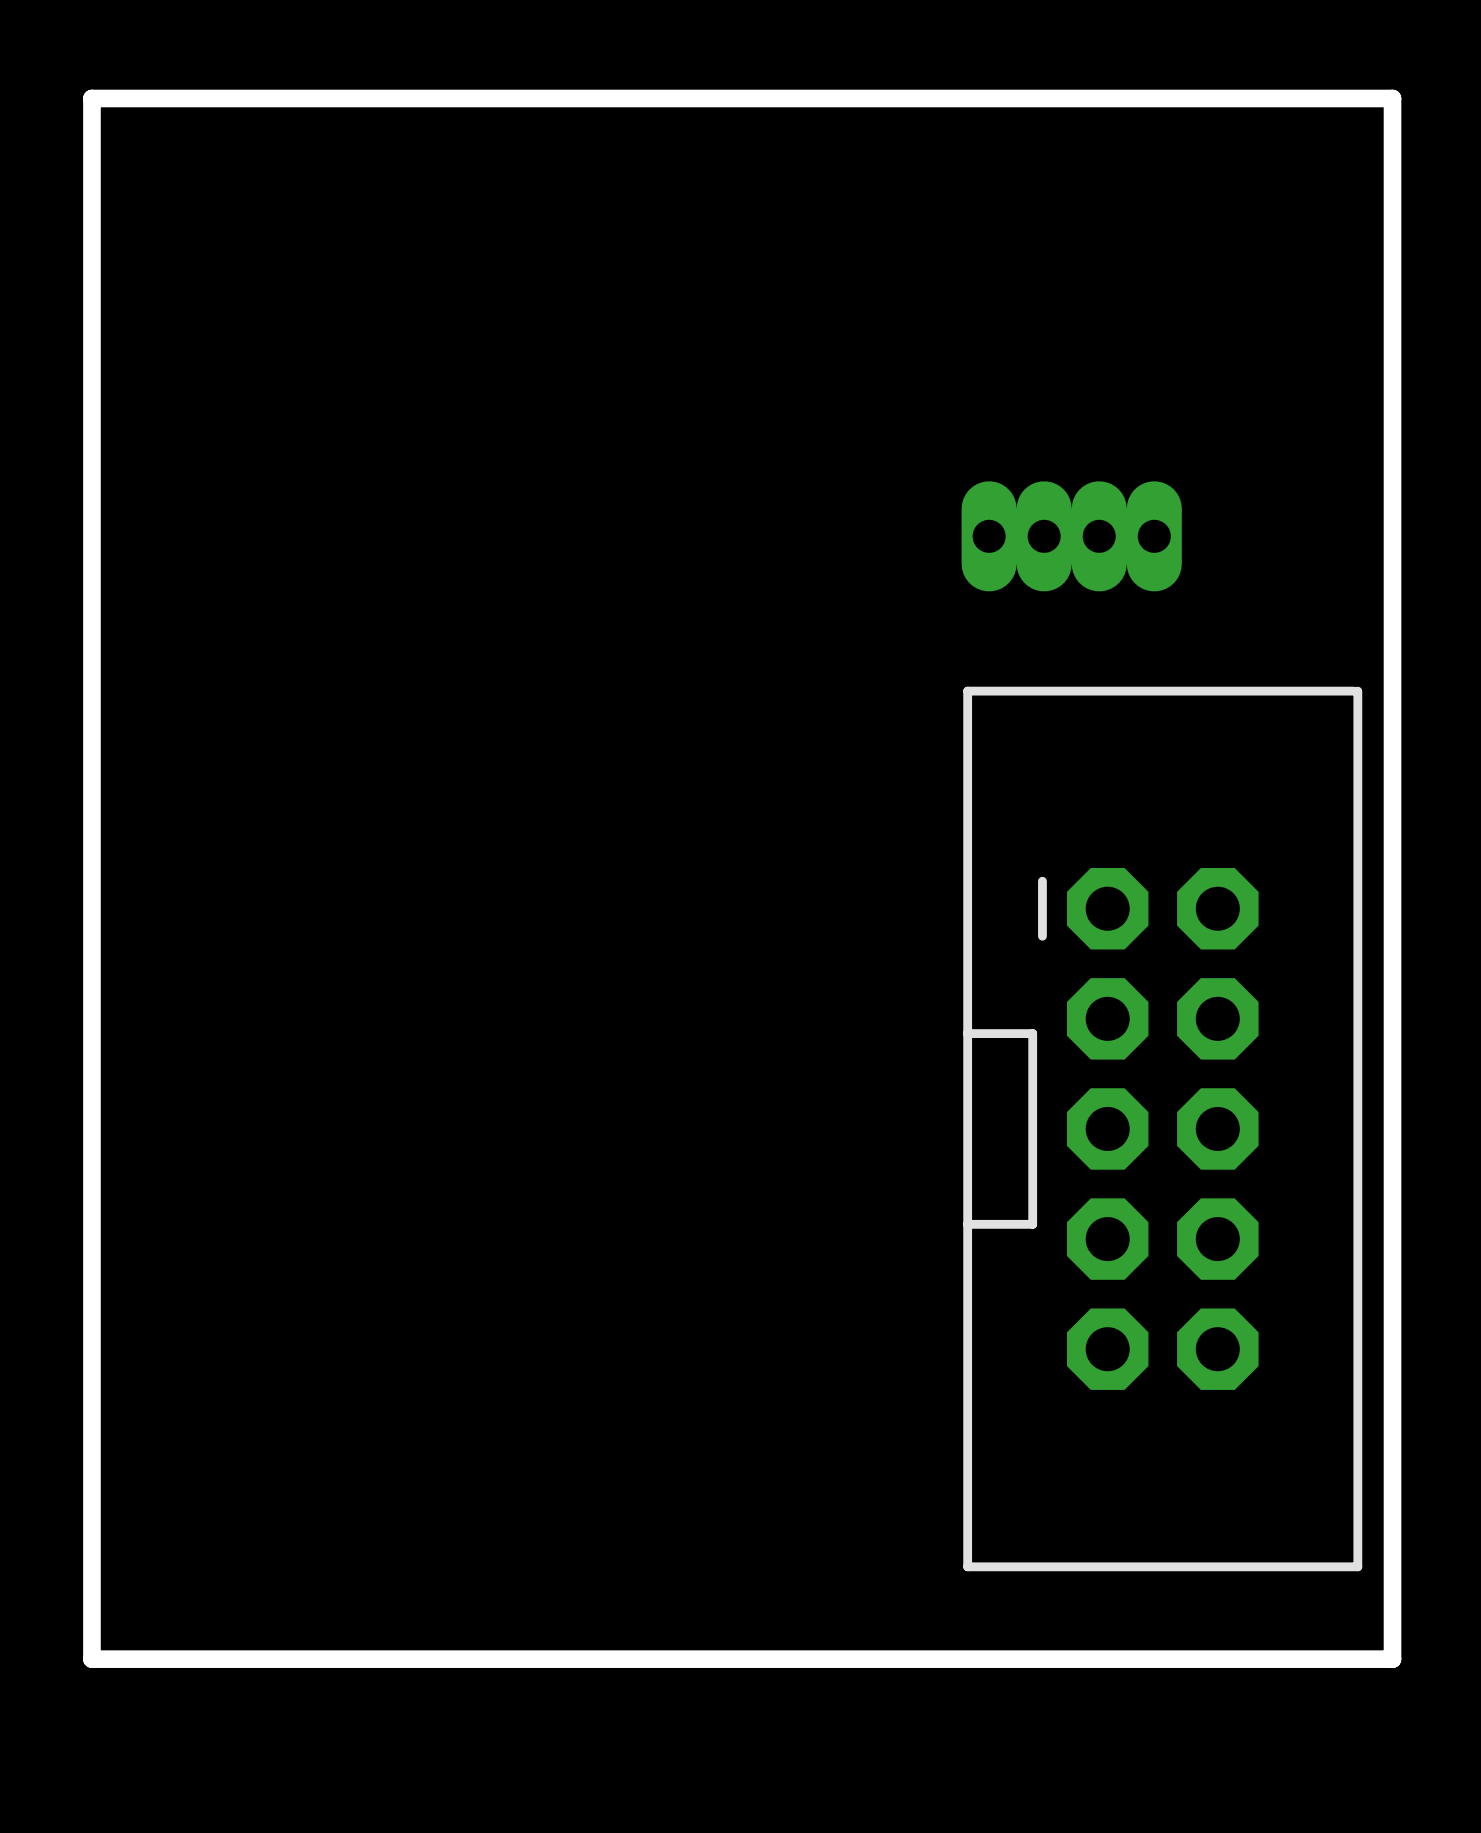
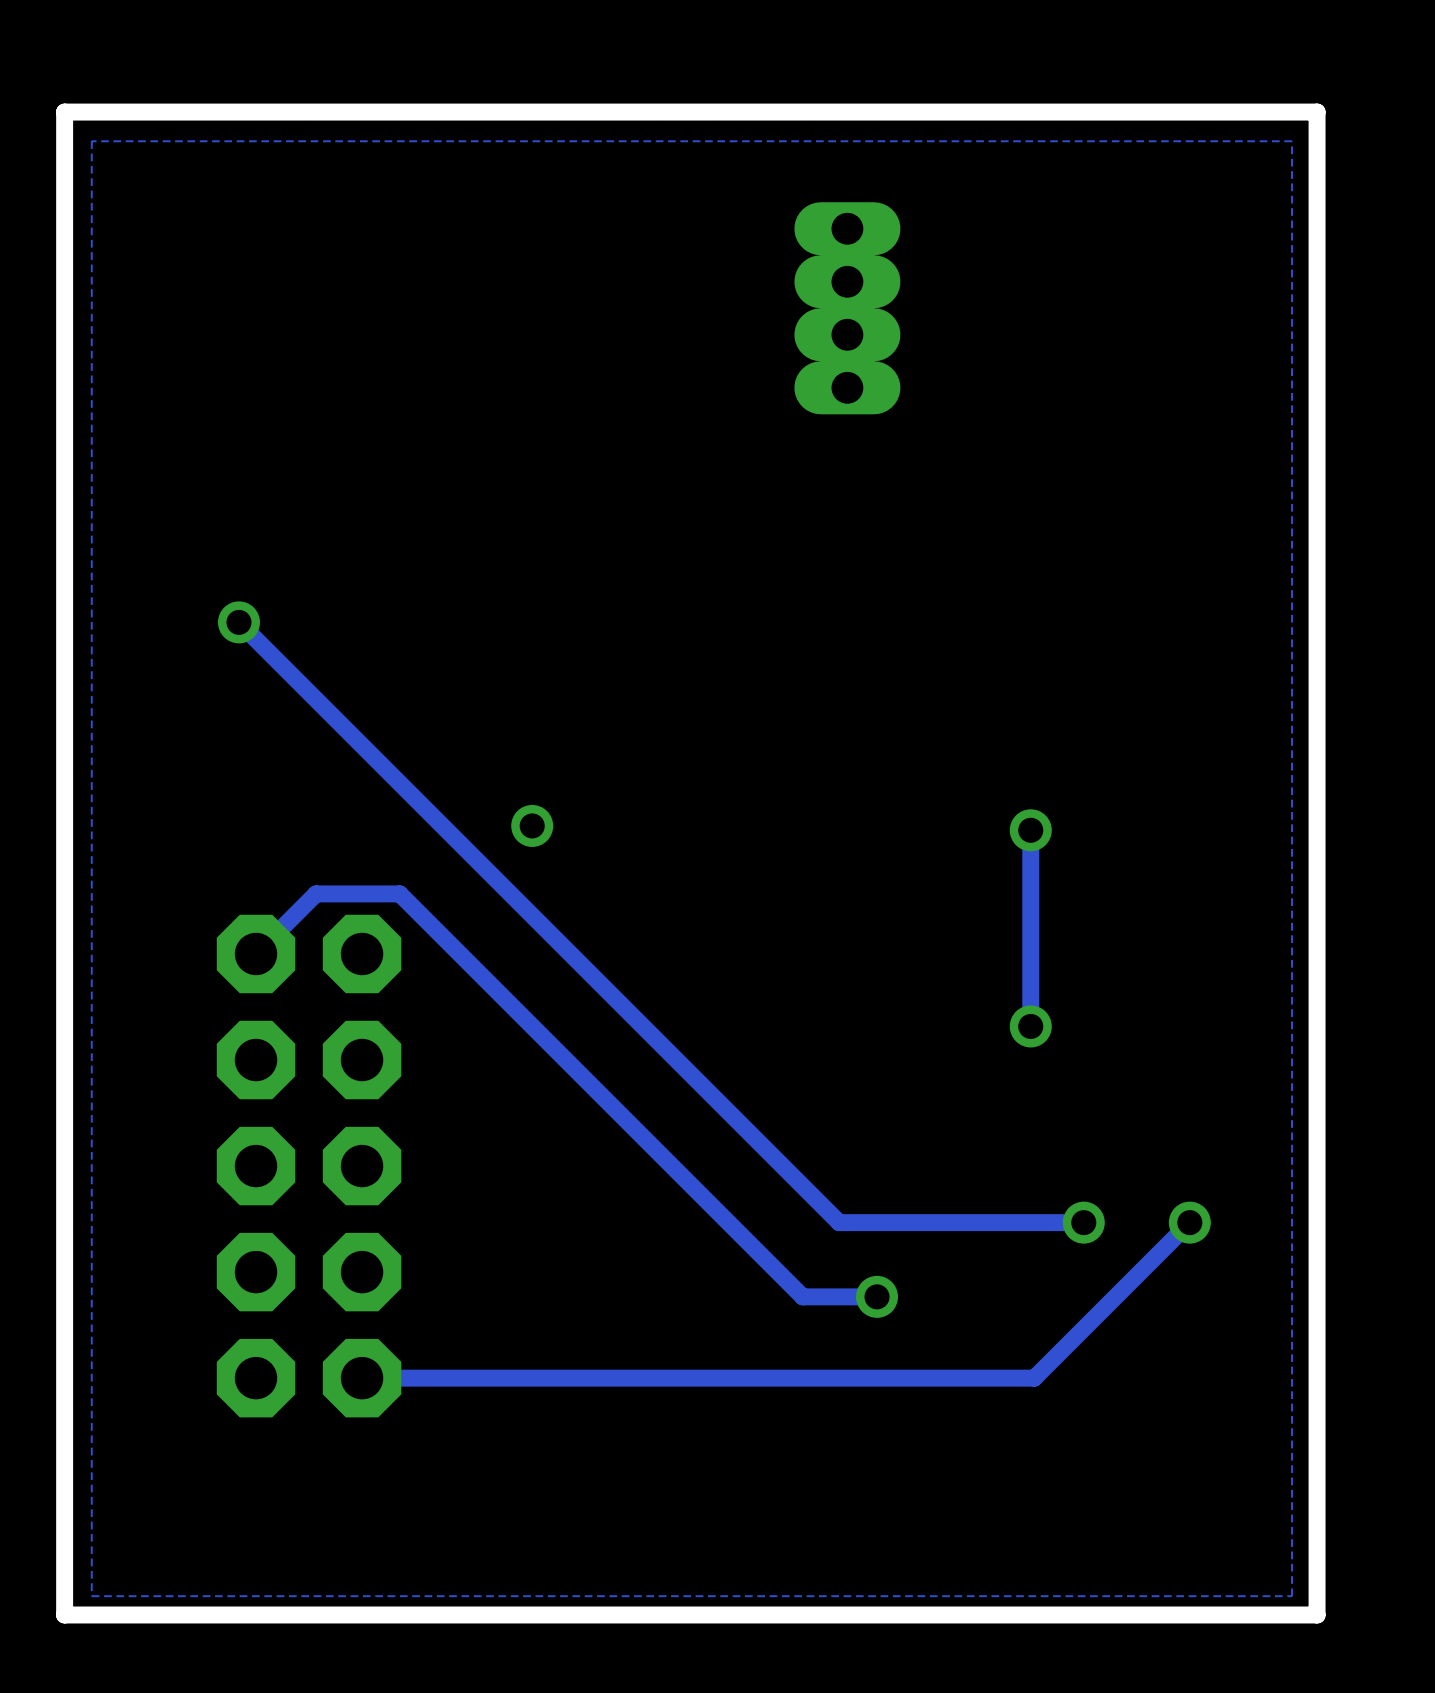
zone outline: none -> (1292, 141) (1292, 1596) (91, 1596) (91, 141) (1292, 141)
part rotation: 0° (1071, 536) -> 90° clockwise (847, 308)
part position: (1071, 536) -> (847, 308)
track: none -> (238, 622) (839, 1222) (1083, 1222)
via: none -> (238, 622)
via: none -> (532, 825)
track: none -> (1030, 830) (1030, 1026)
via: none -> (1030, 830)
track: none -> (256, 953) (316, 893) (399, 893) (802, 1296) (877, 1296)
via: none -> (1030, 1026)
part side: bottom (1162, 1128) -> top (309, 1166)
via: none -> (1083, 1222)
track: none -> (1189, 1222) (1034, 1378) (362, 1378)
via: none -> (1189, 1222)
via: none -> (877, 1296)

